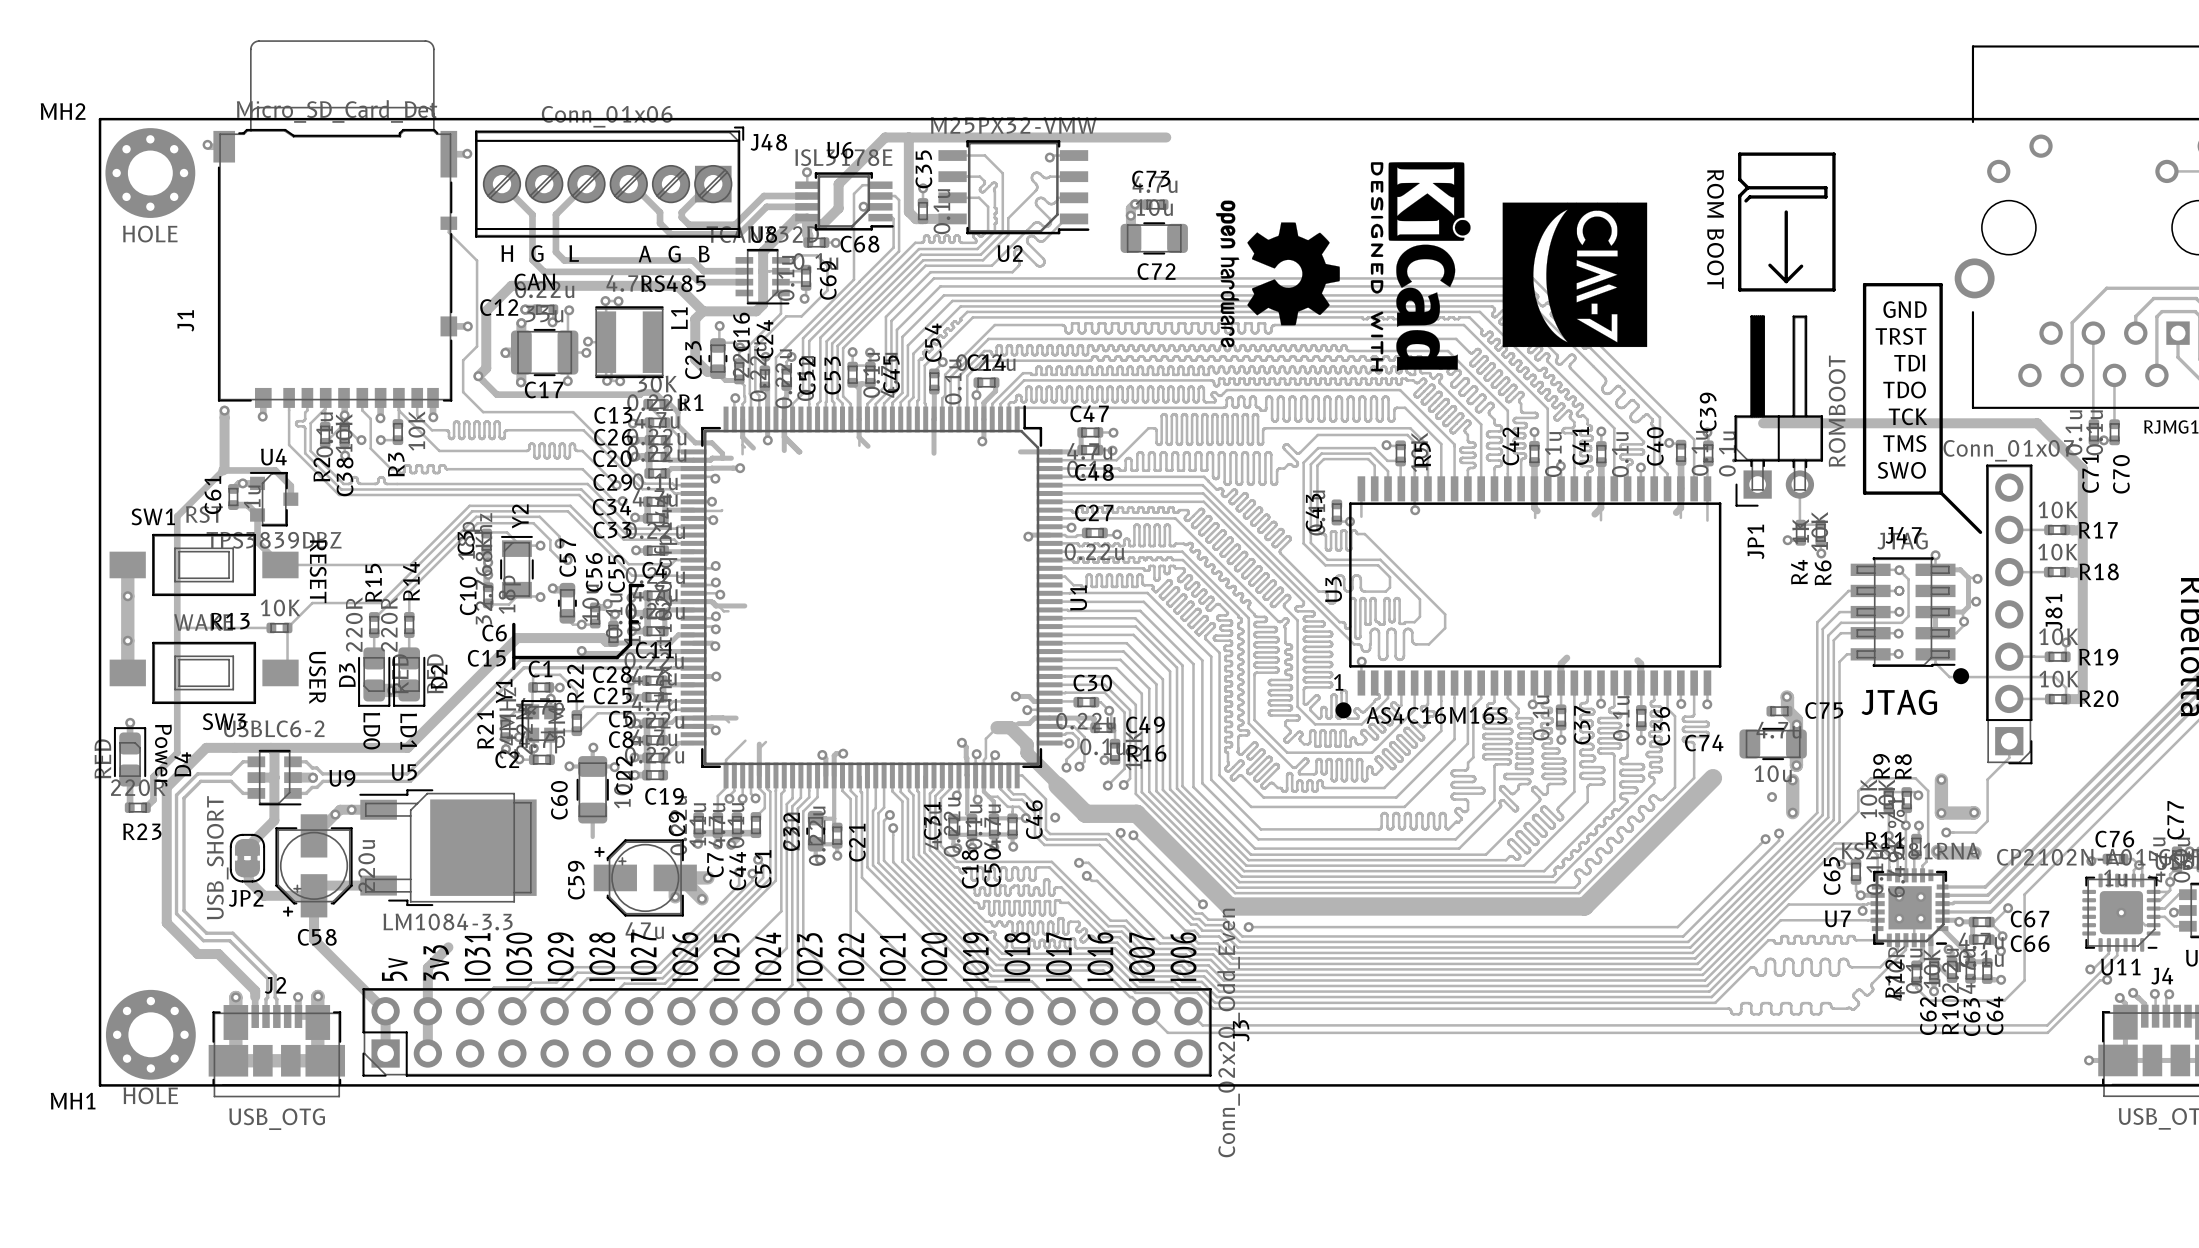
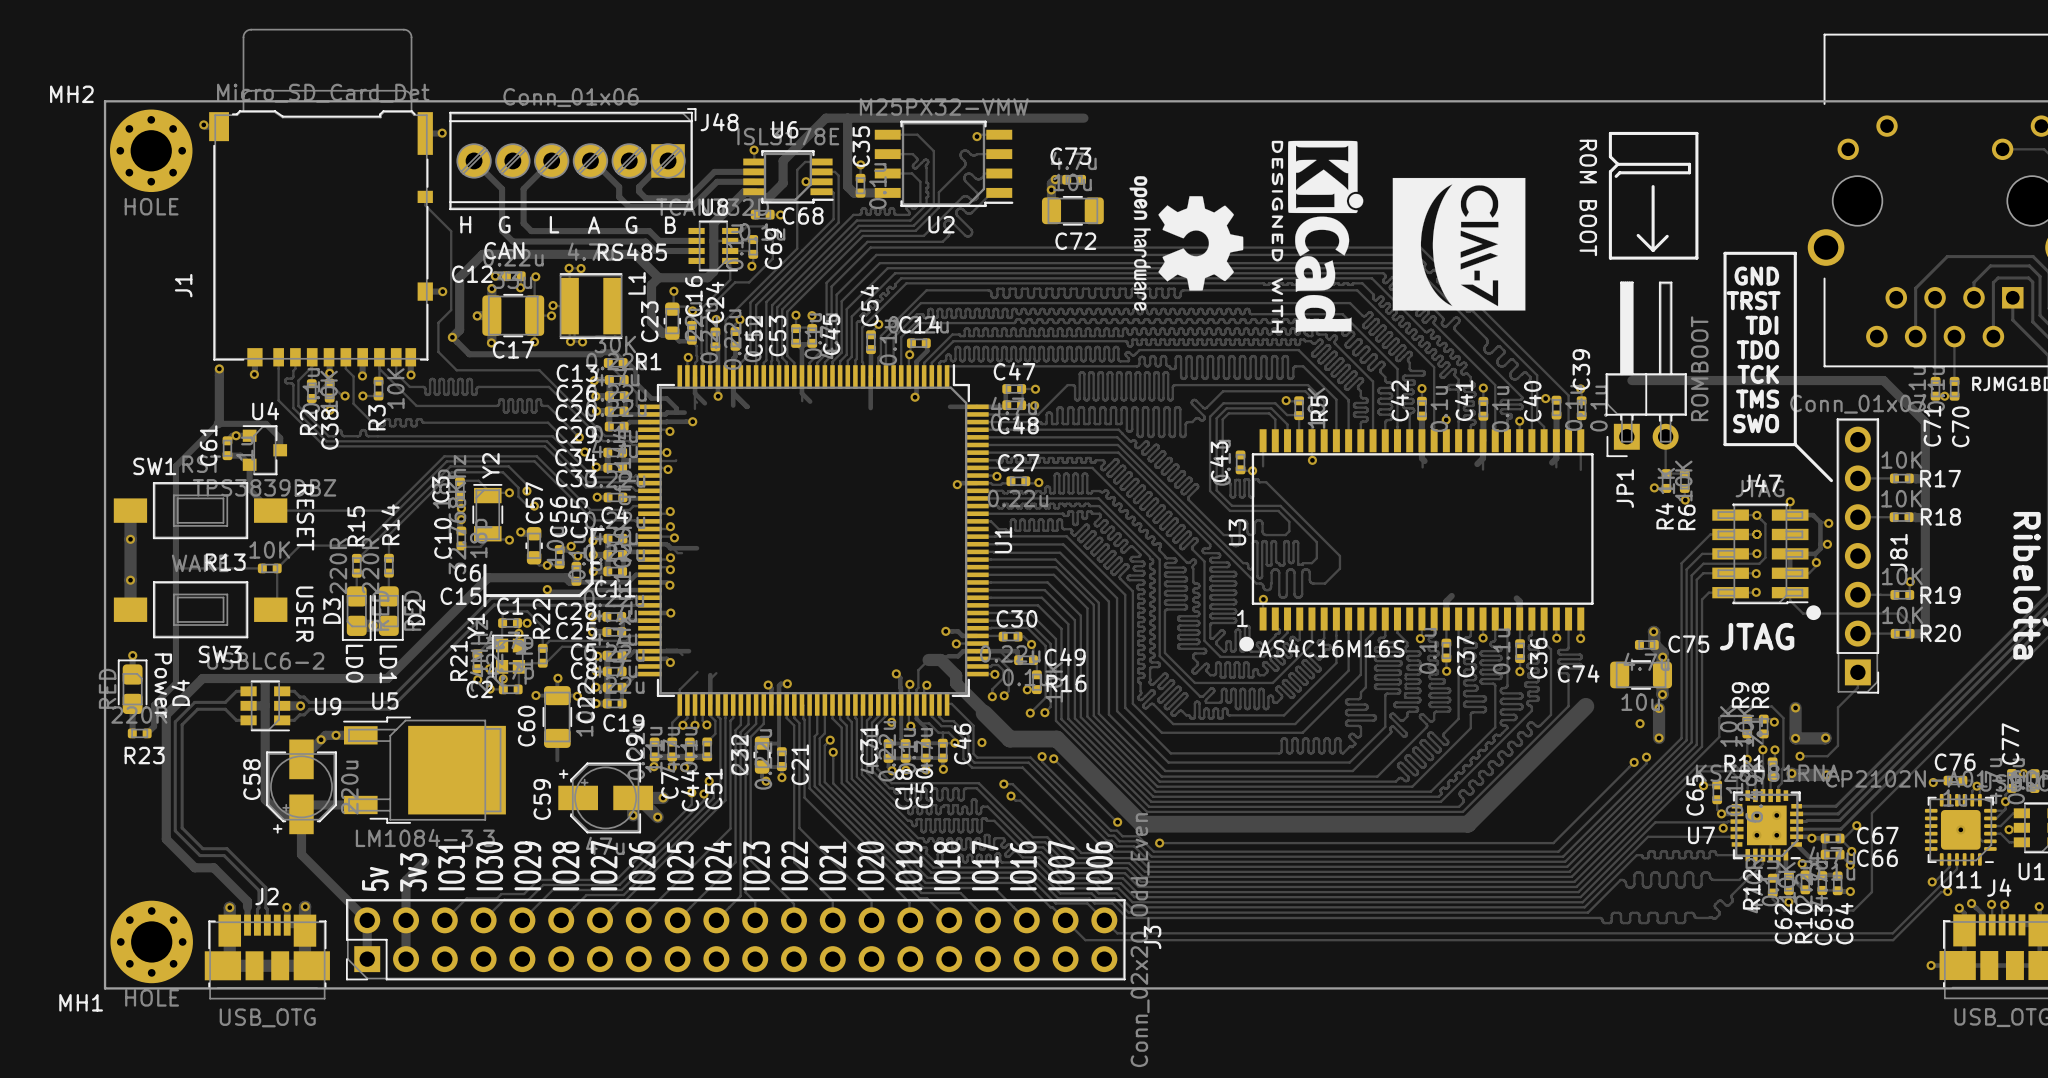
track: (274, 777) (274, 820) (247, 847) -> (265, 705) (265, 799) (280, 814)
JP2: USB_SHORT (247, 858) -> none
track: (247, 870) (248, 880) (263, 895) (290, 895) -> none
C58 name rotation: 0° (317, 937) -> 90° counterclockwise (251, 779)
C58 name position: C58 (317, 937) -> C58 (251, 779)

